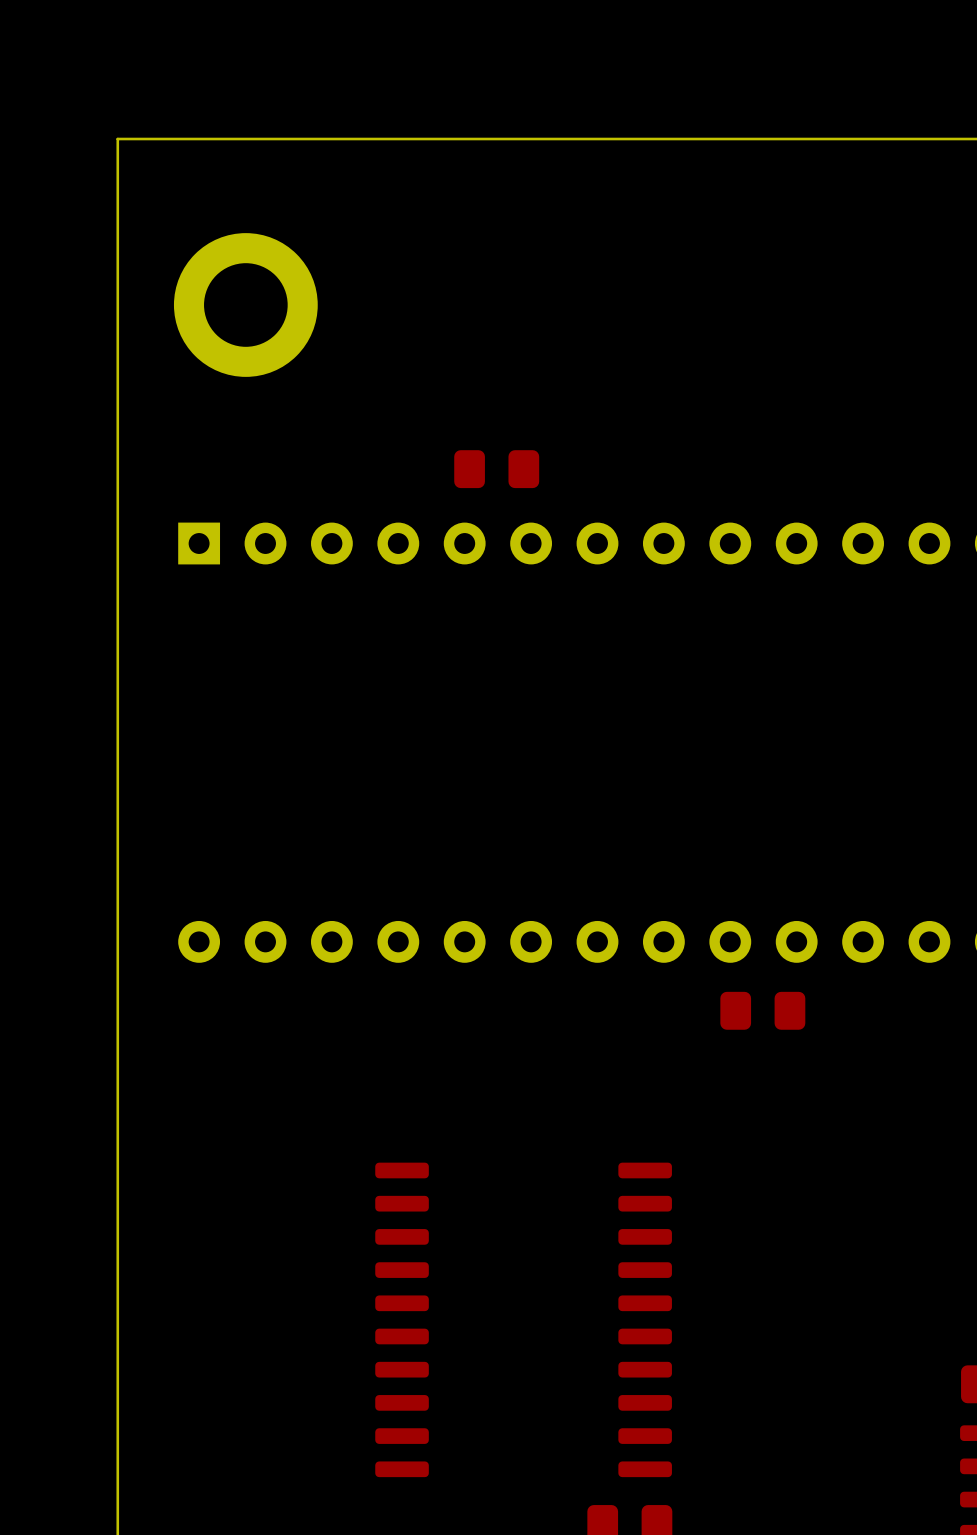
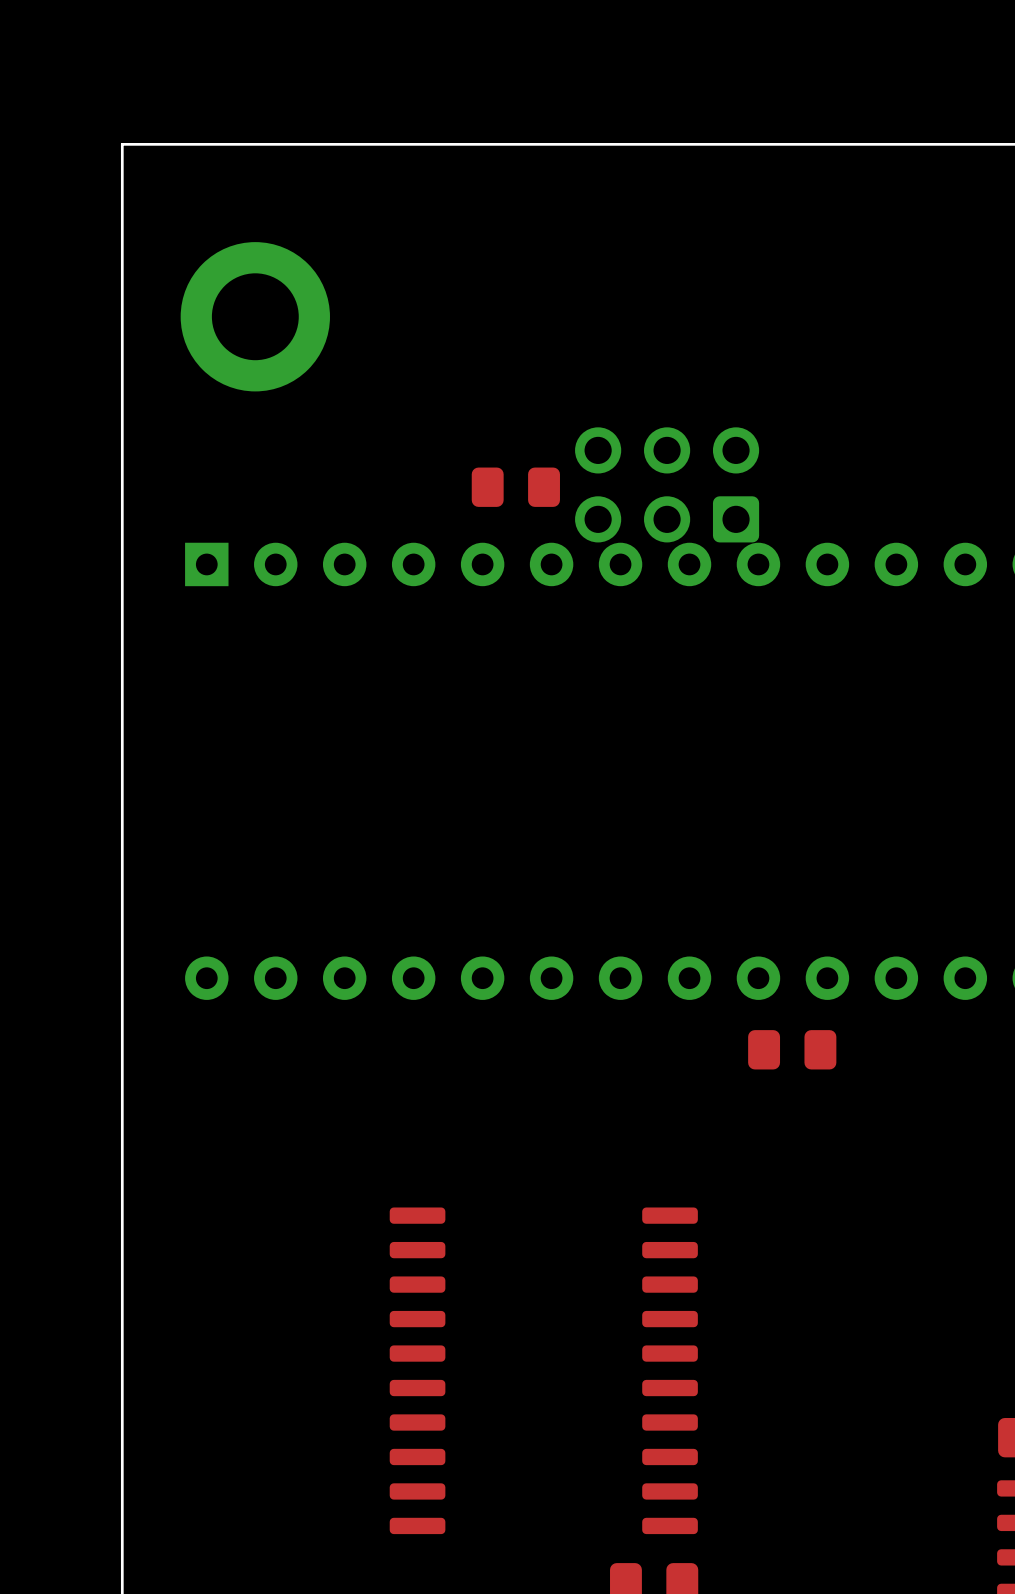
part: none -> (667, 484)

